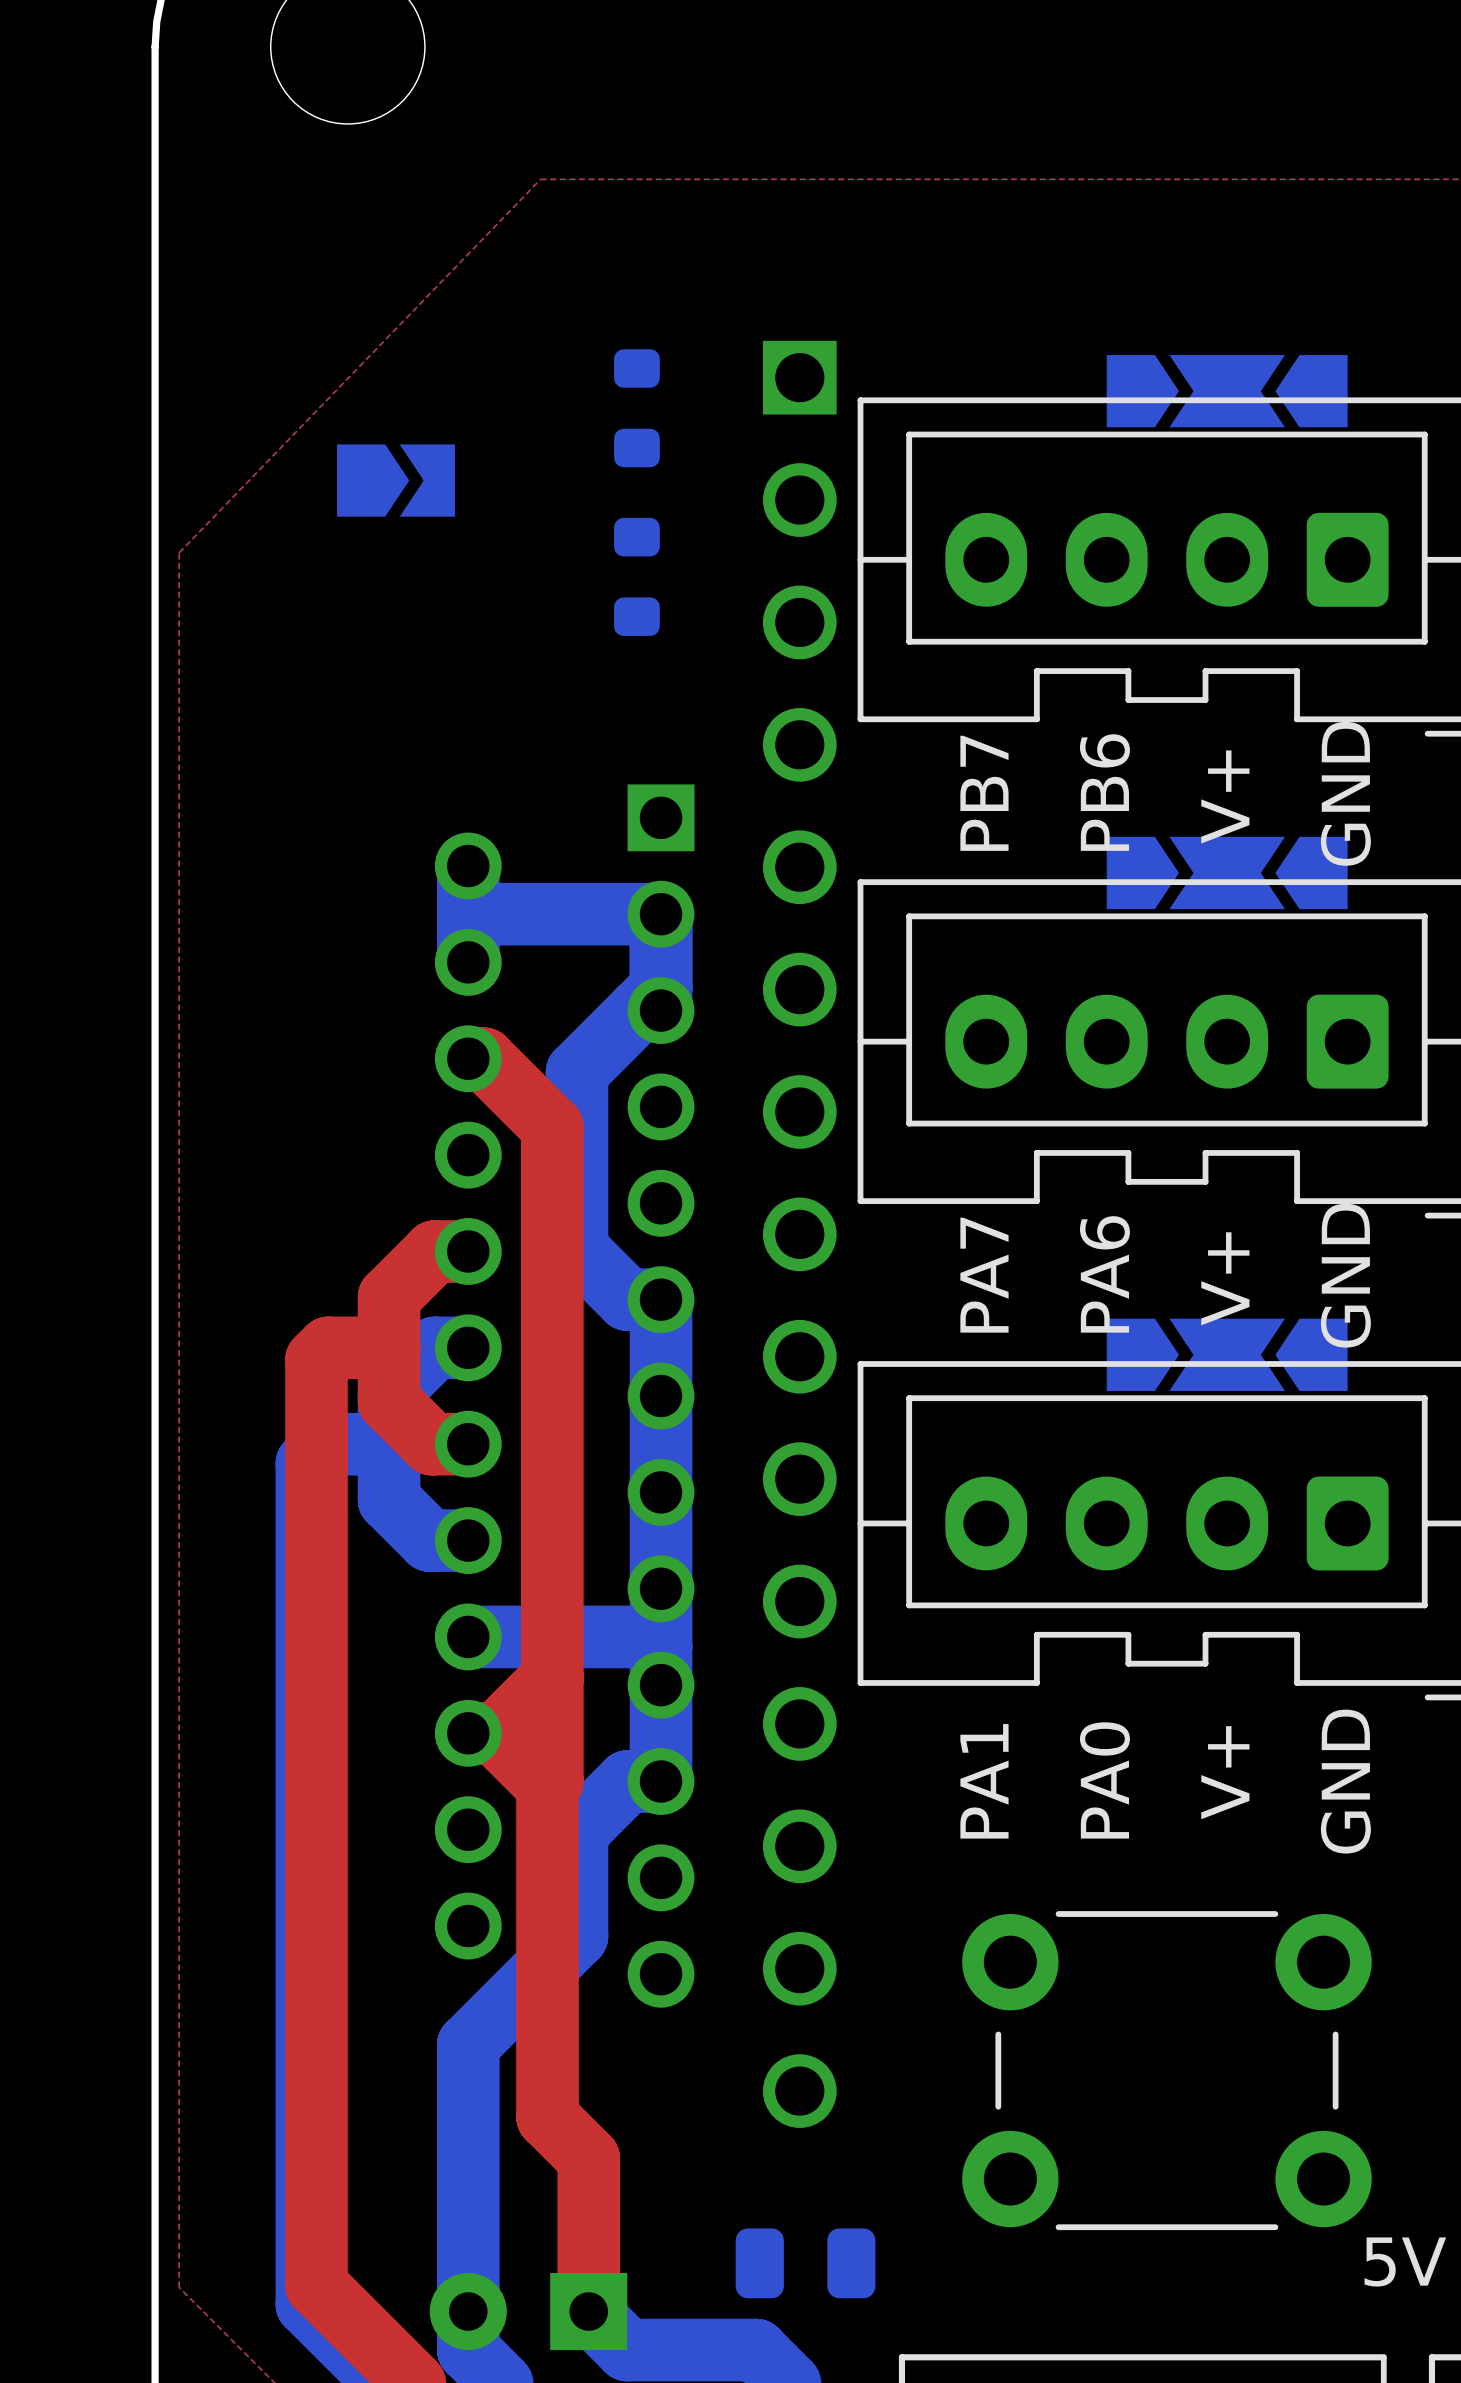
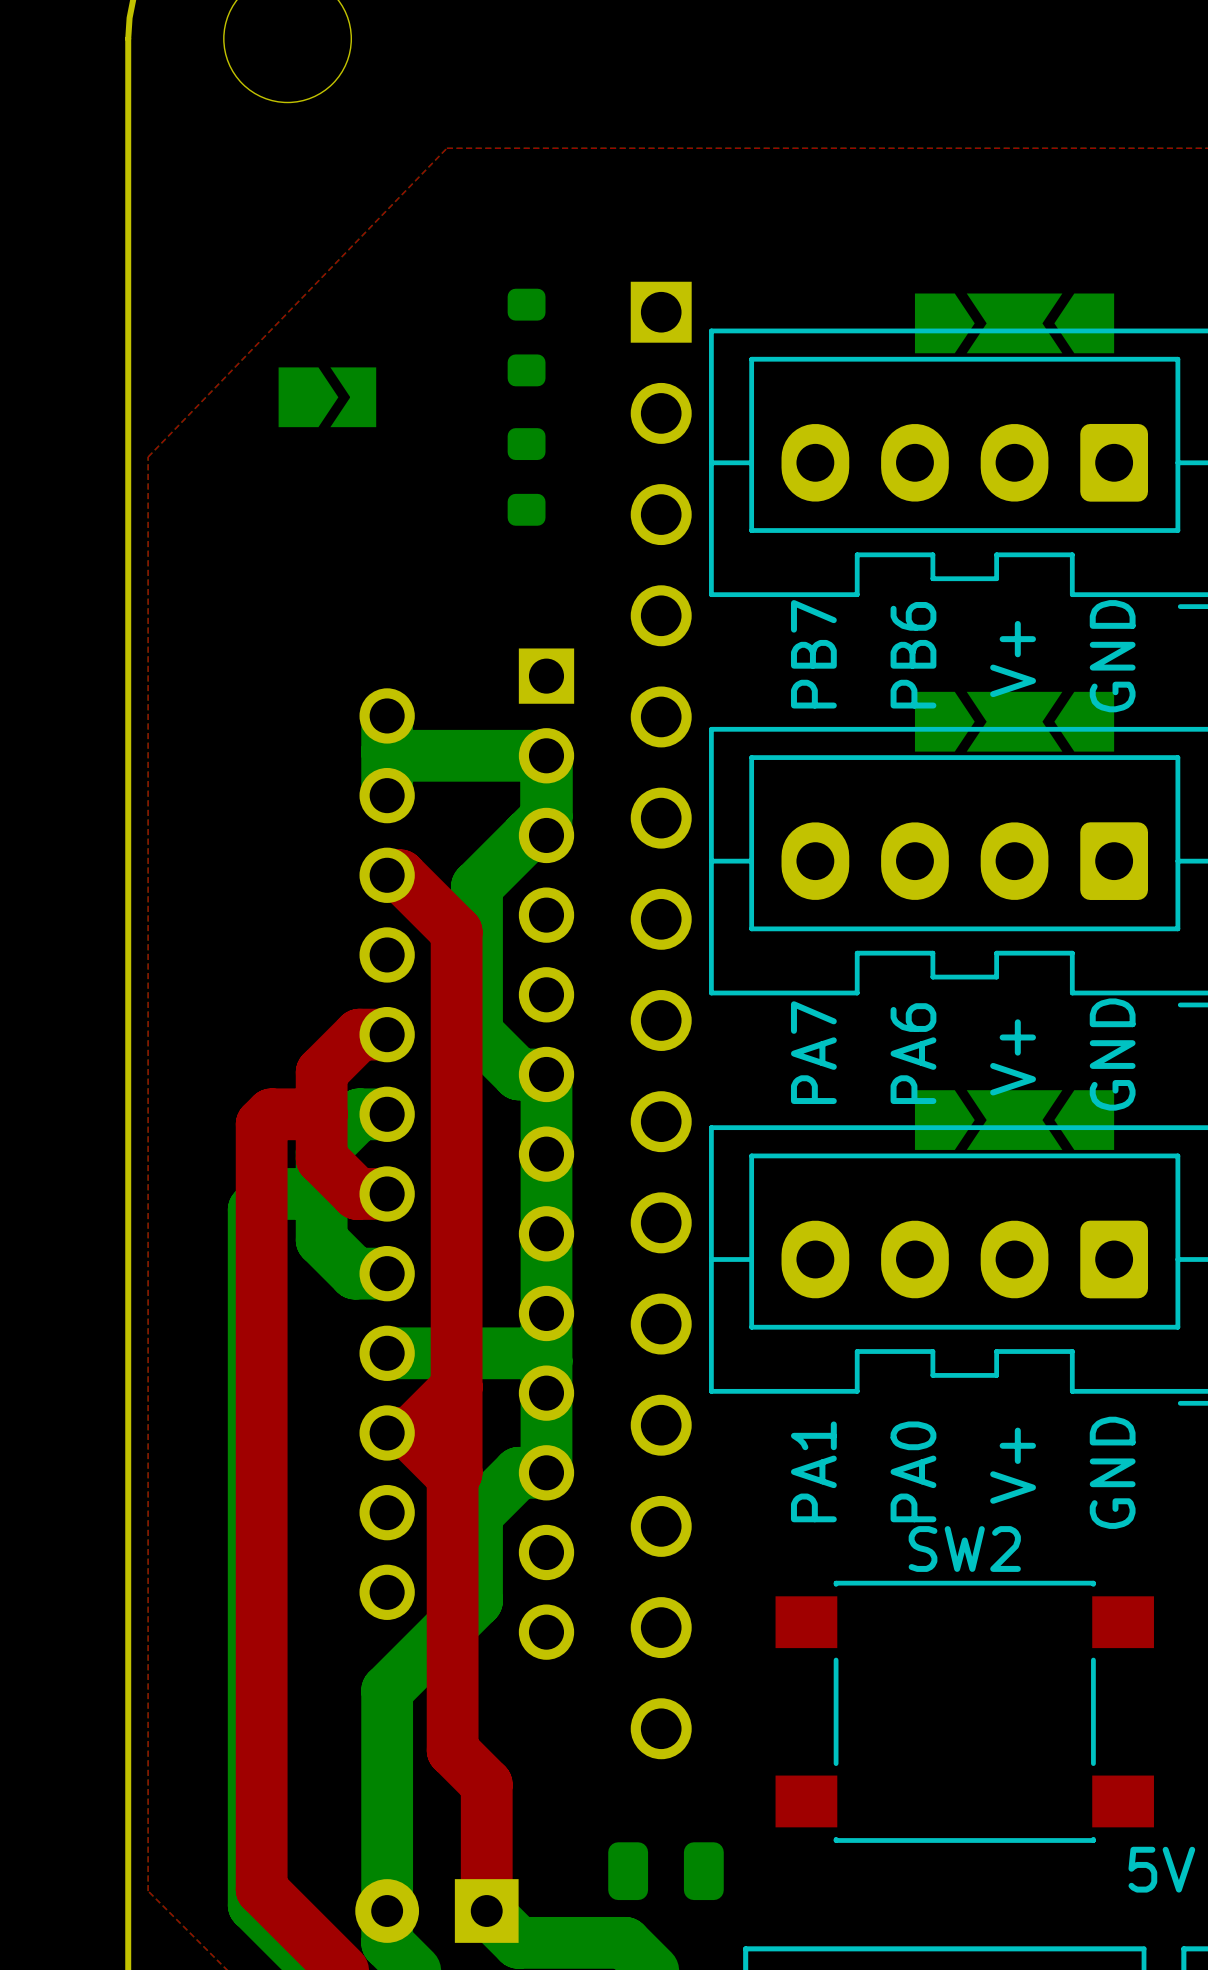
part: (1166, 2070) -> none
SW2: none -> (964, 1711)

